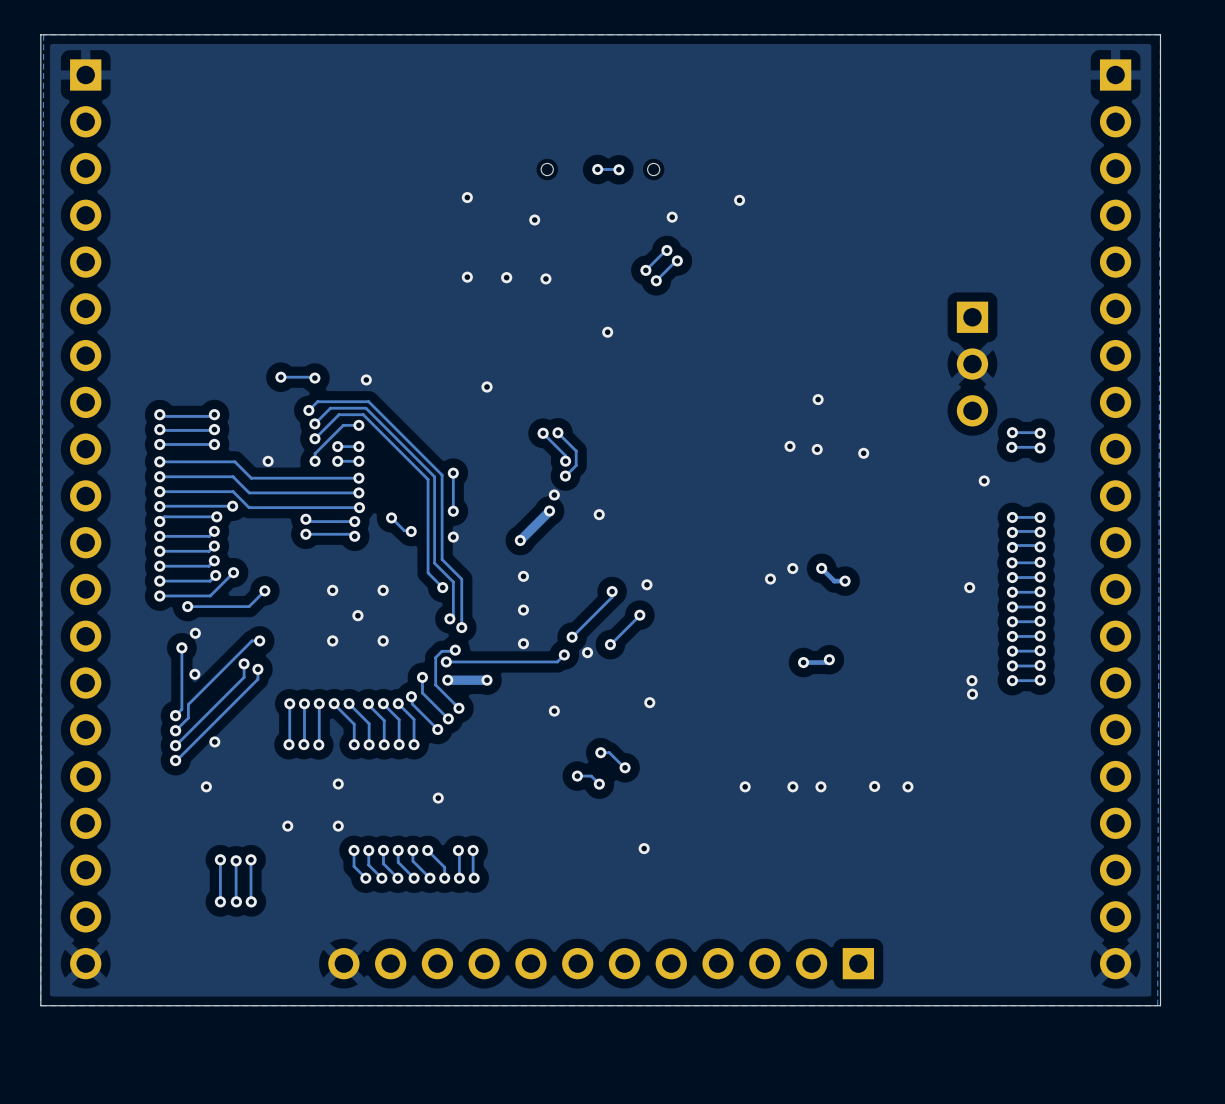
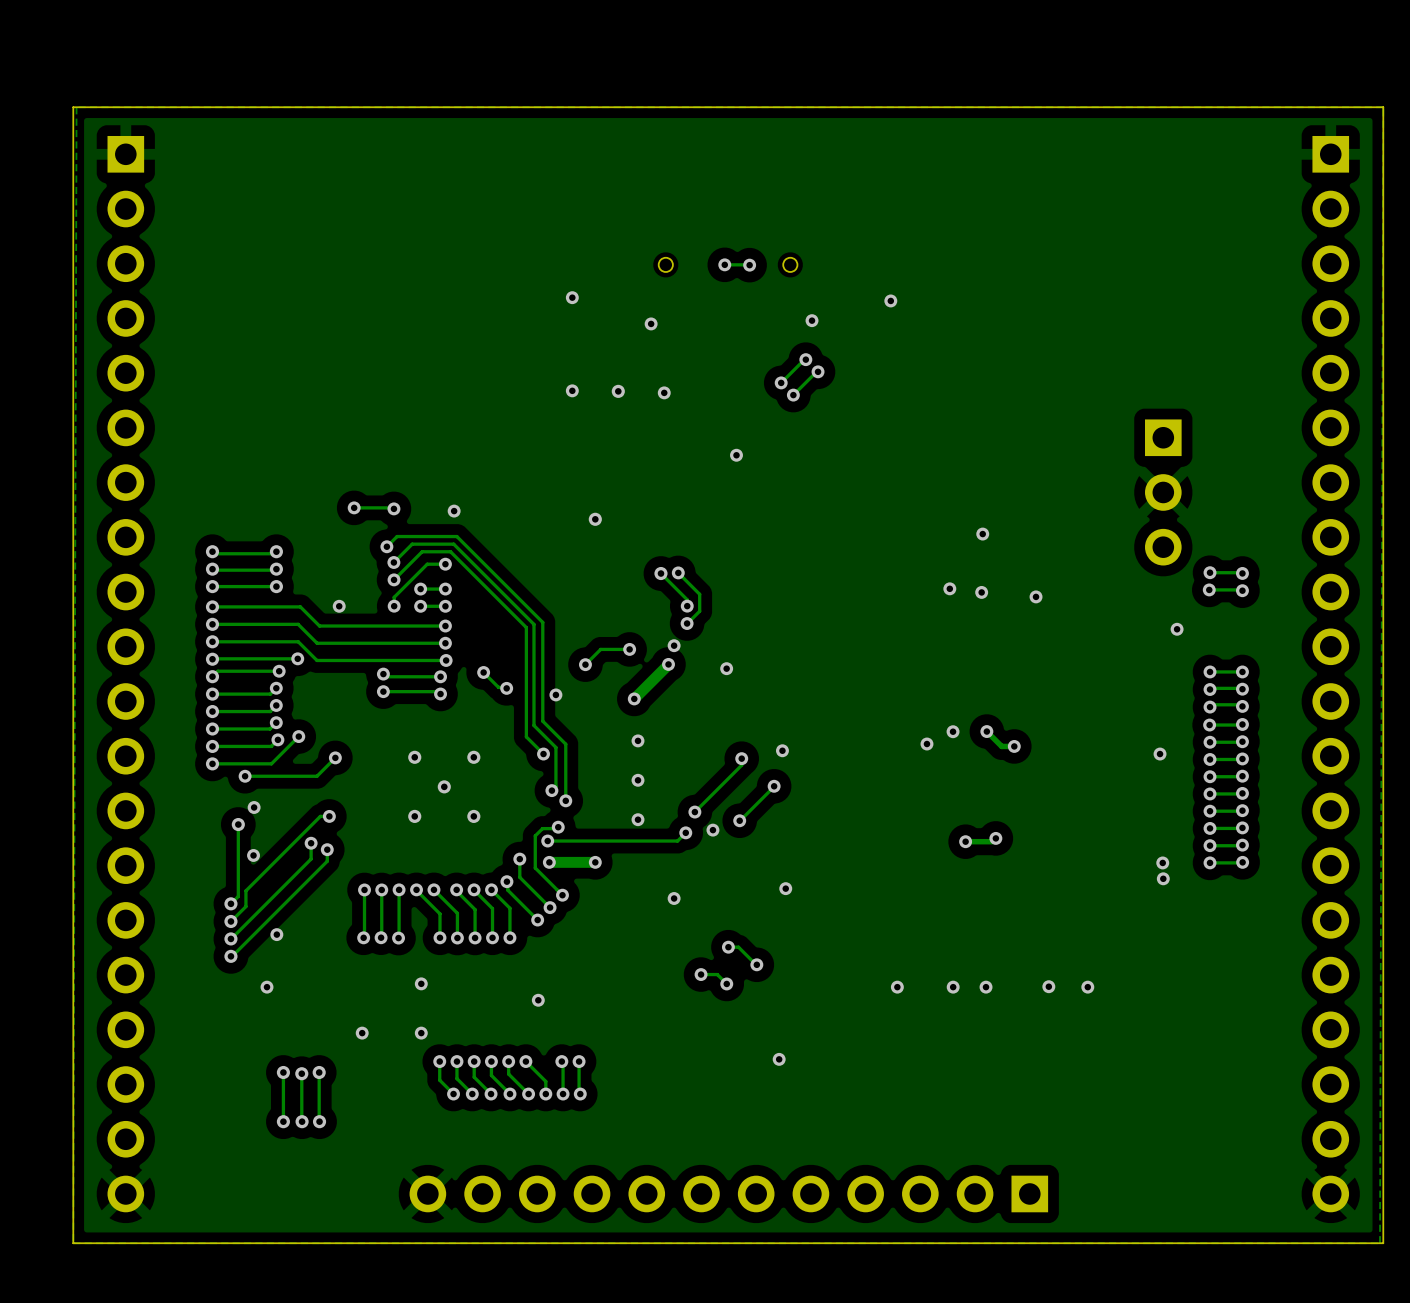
track: (453, 473) (453, 511) -> none
via: (453, 473) -> none
track: none -> (629, 649) (600, 649) (585, 664)
via: none -> (629, 649)
via: (453, 511) -> none
via: none -> (585, 664)

